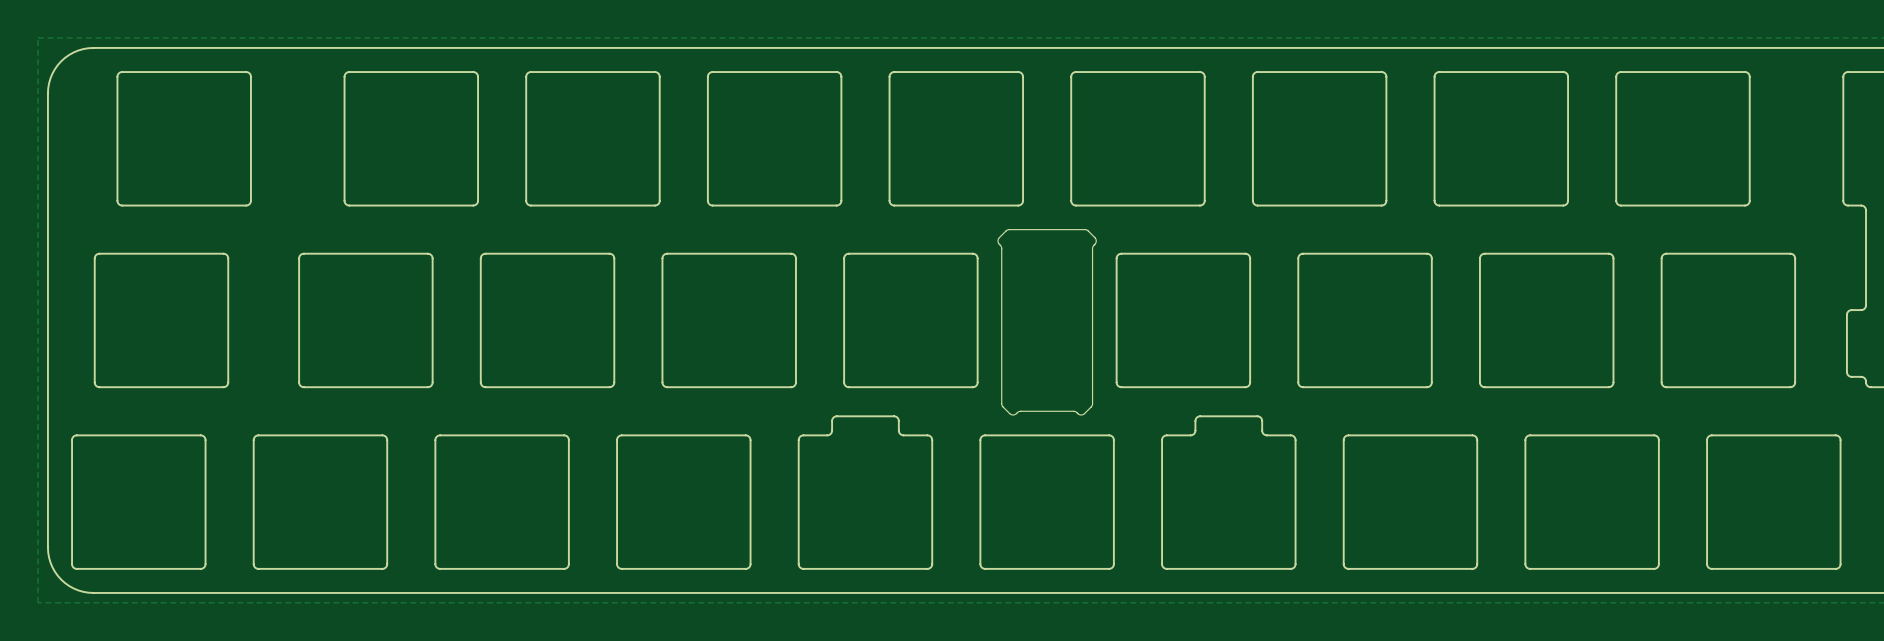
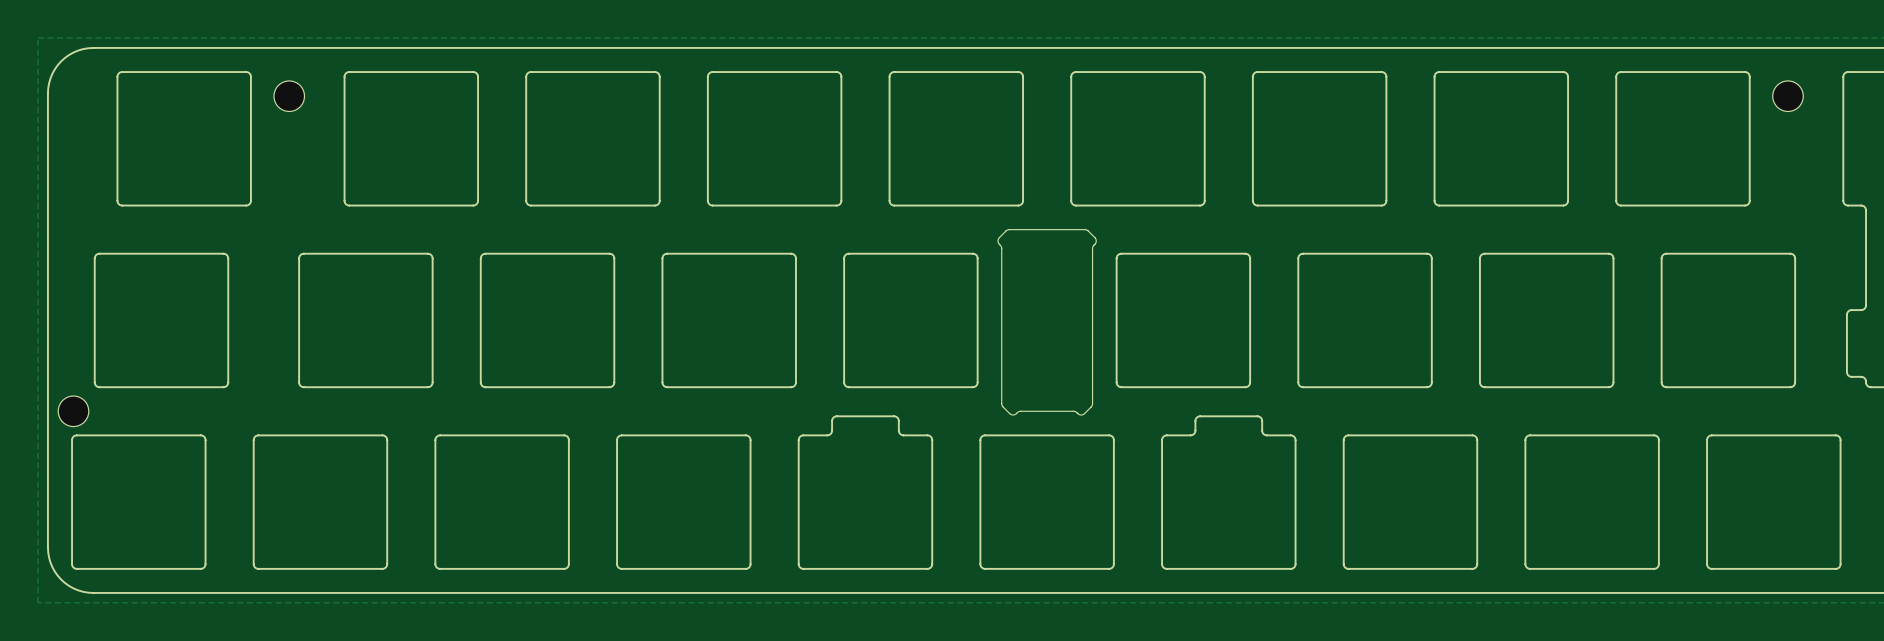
part: none -> (289, 96)
part: none -> (1788, 96)
part: none -> (73, 411)

